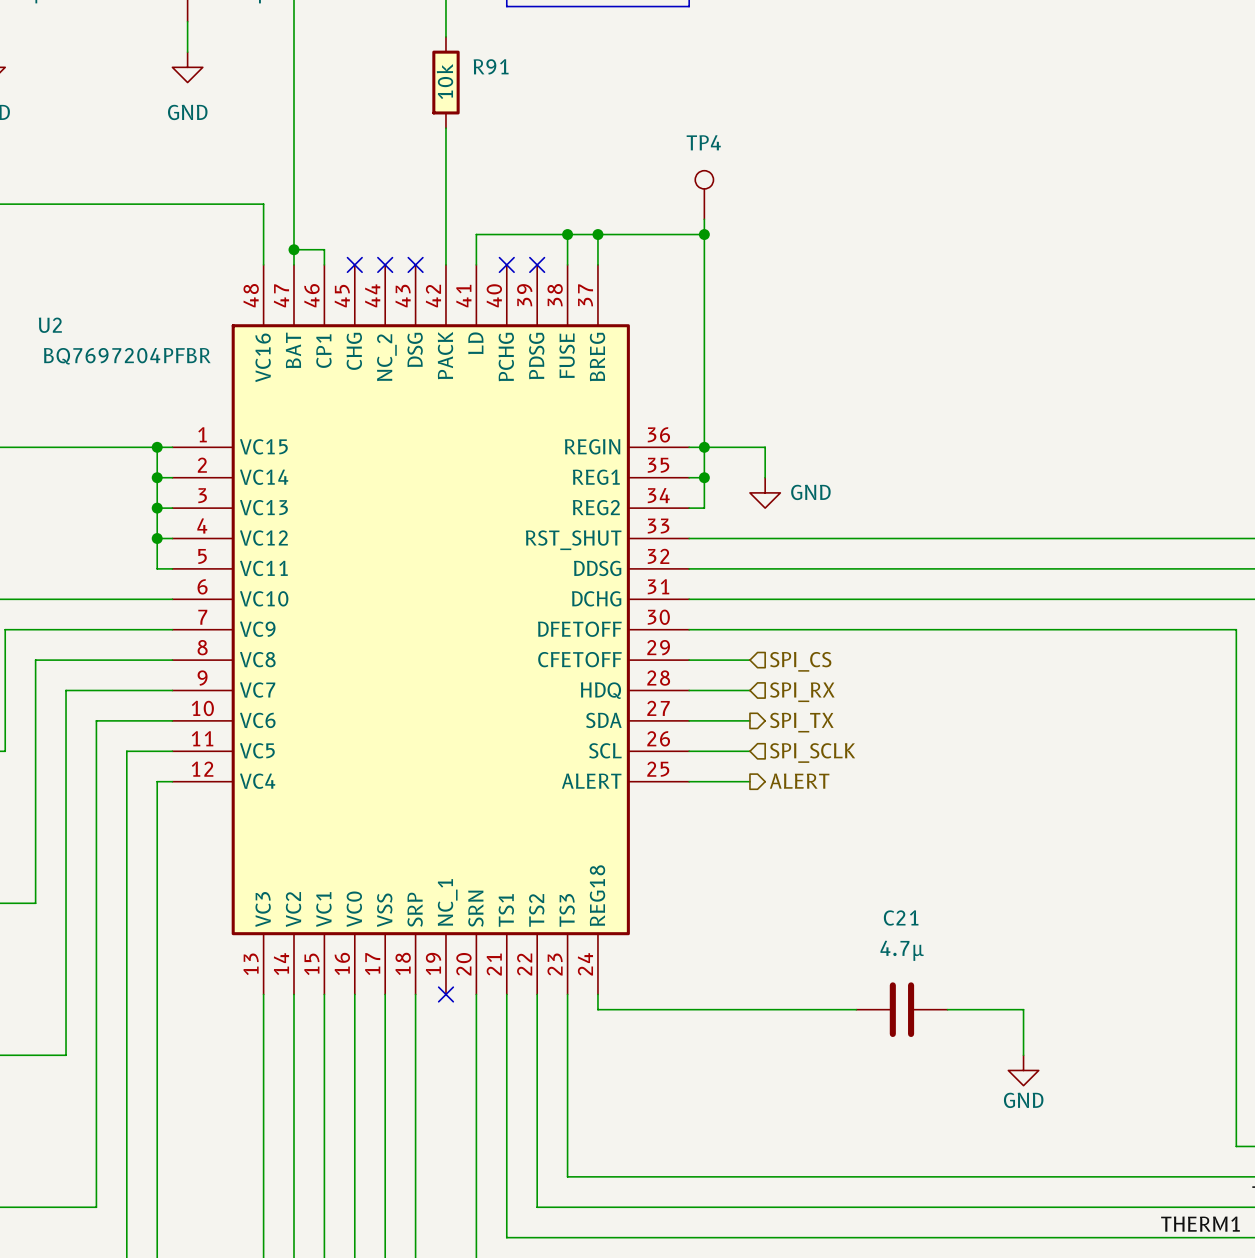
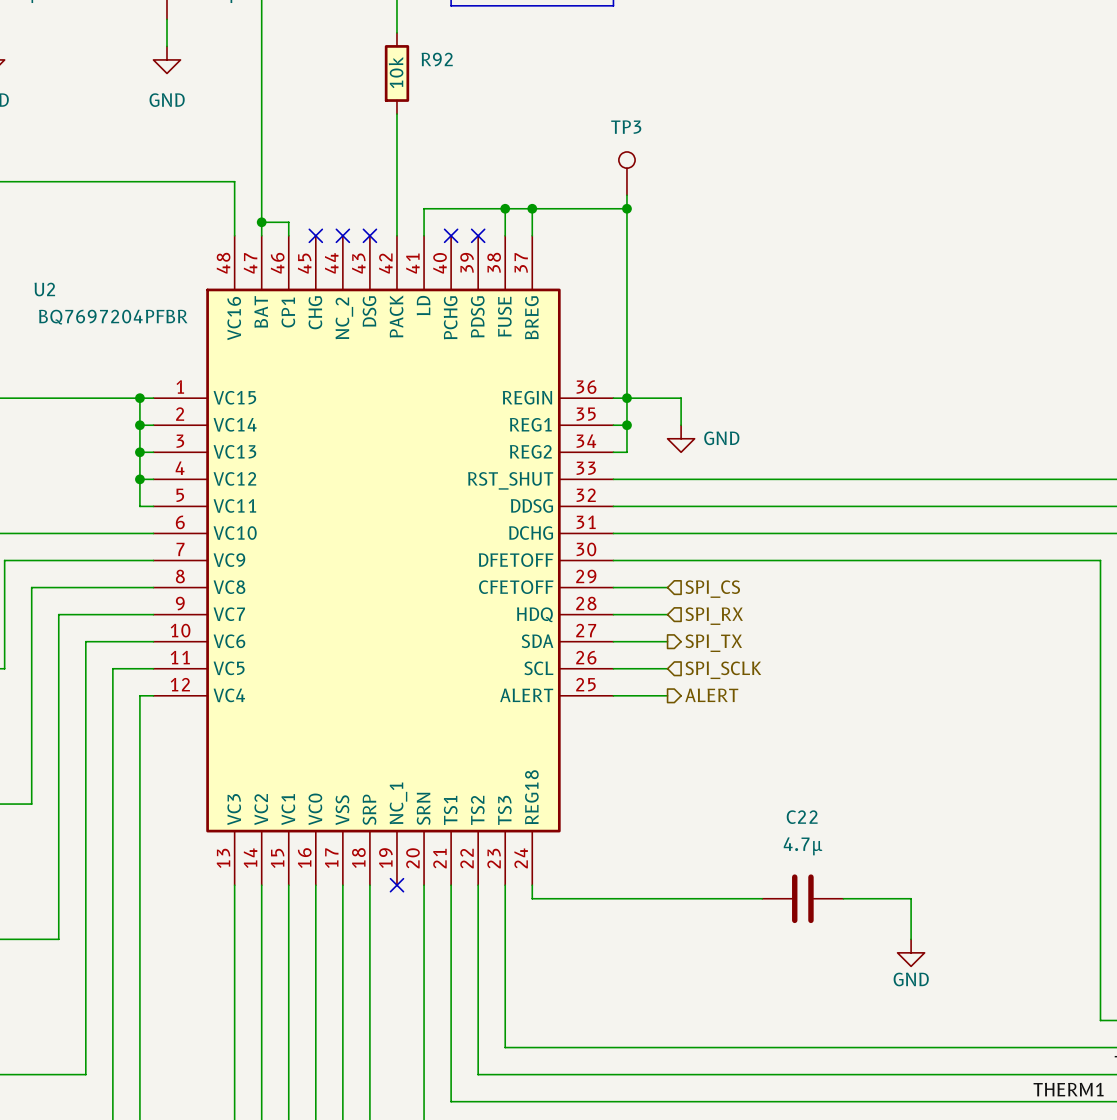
R91 name: R91 (491, 66) -> R92 (437, 59)
TP4 name: TP4 (703, 142) -> TP3 (626, 127)
C21 name: C21 (901, 917) -> C22 (802, 817)

